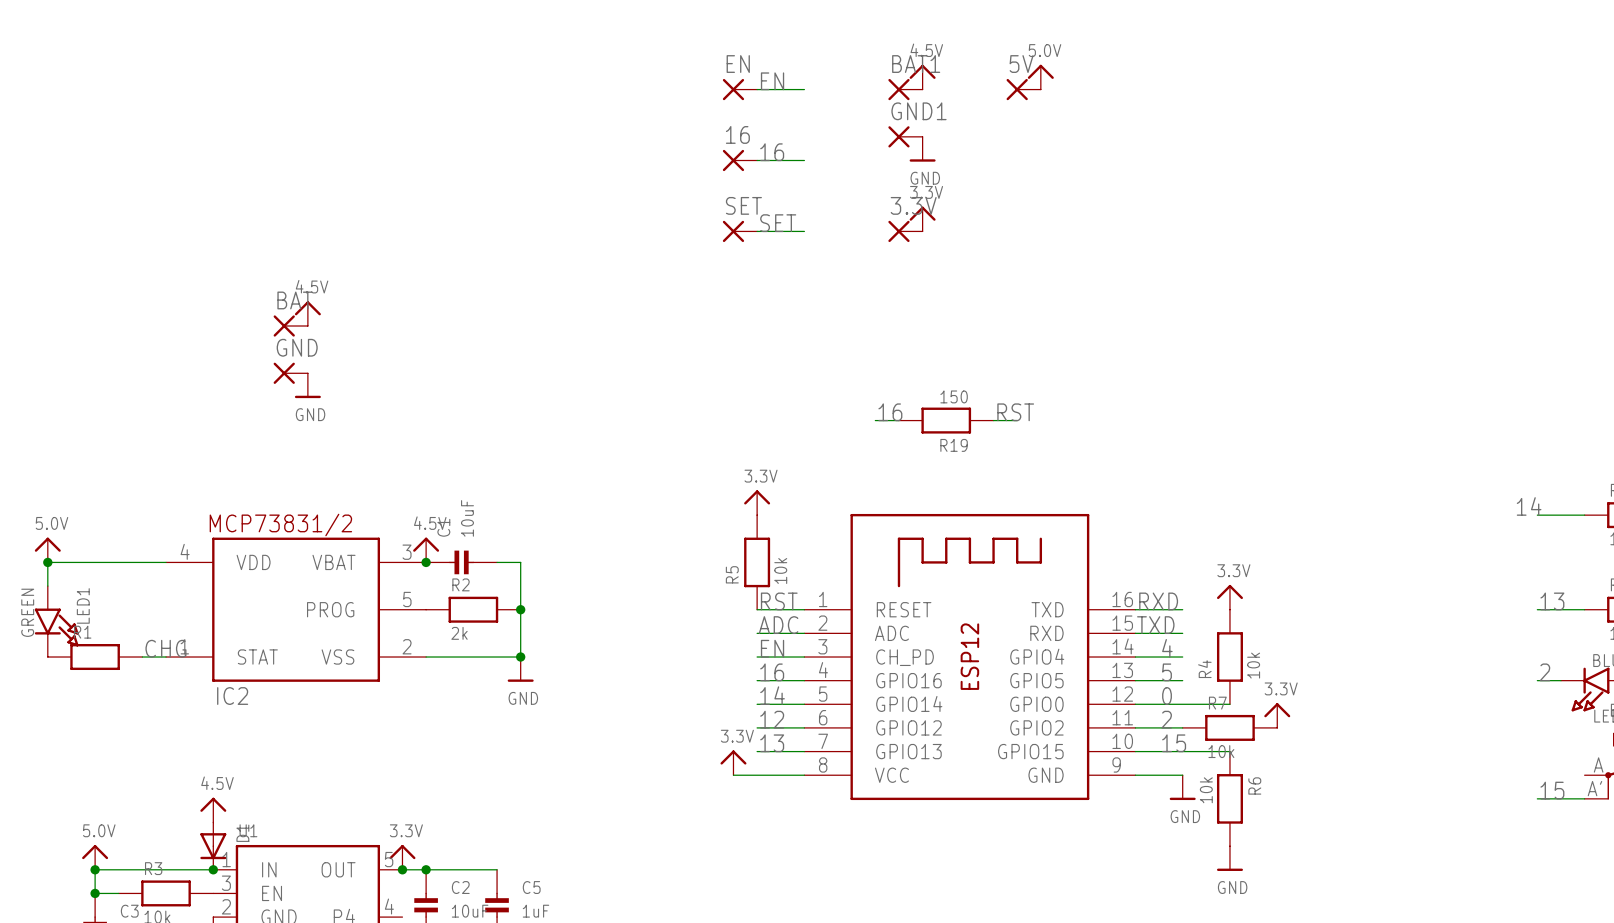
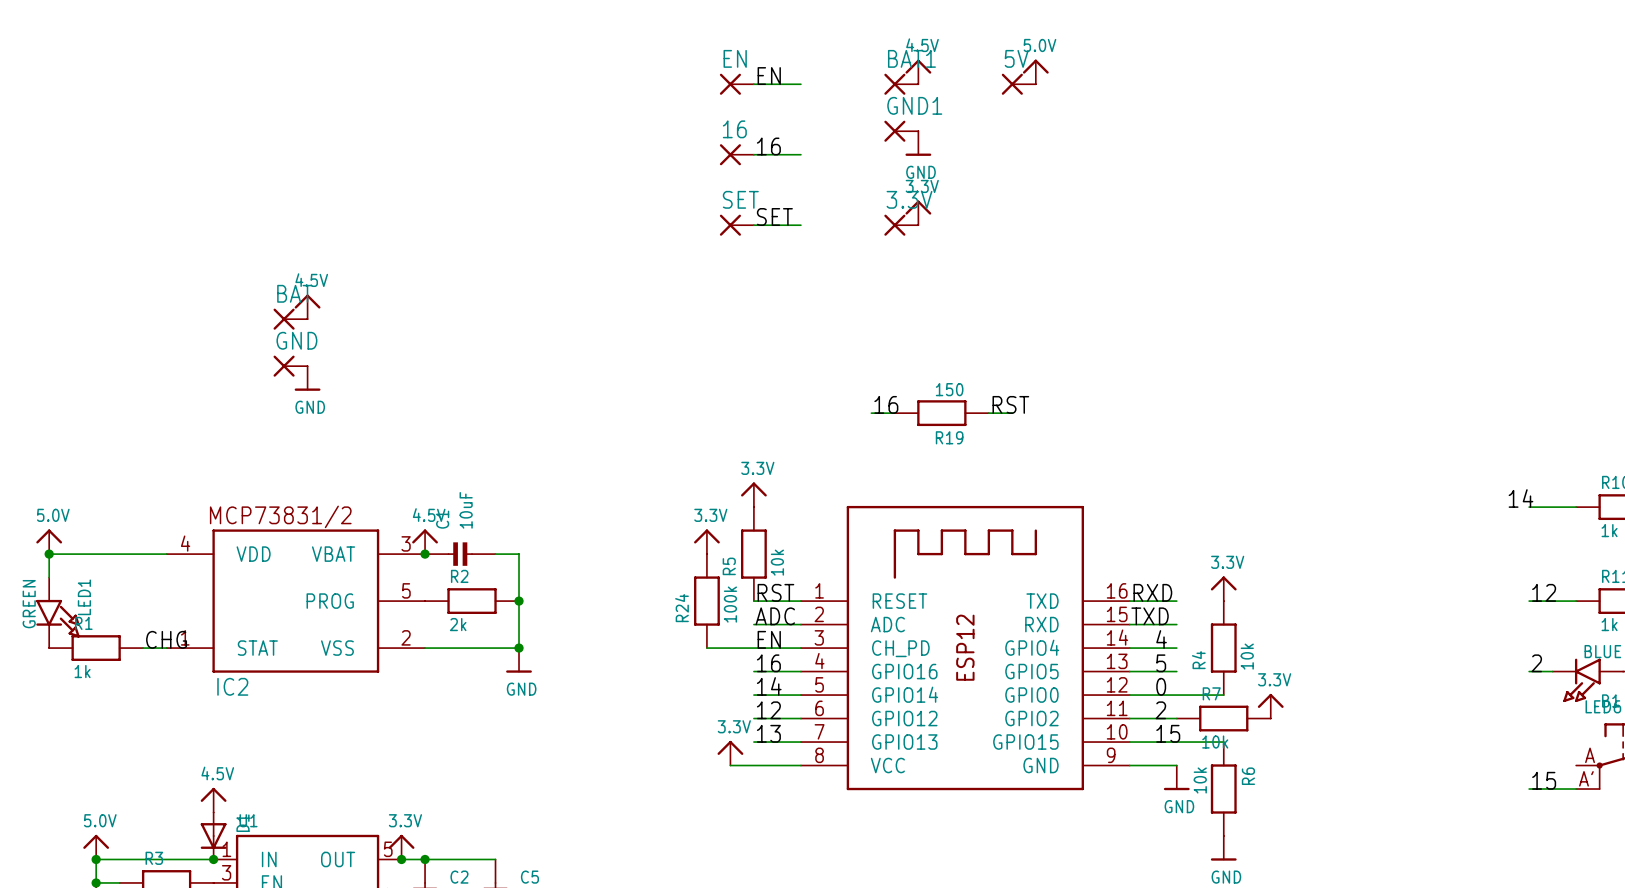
power symbol: none -> 3.3V (706, 541)
label: 13 (1552, 601) -> 12 (1544, 592)
R24: none -> 100k (706, 601)
wire: none -> (706, 648) (753, 648)
R1 value: none -> 1k (82, 671)

